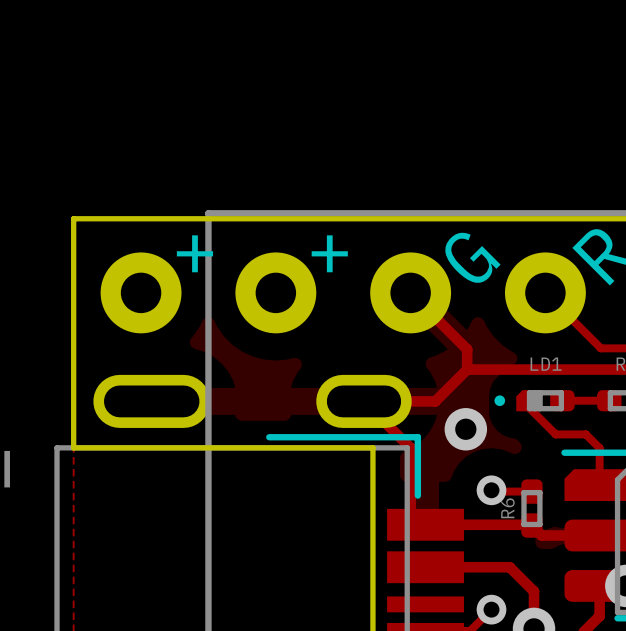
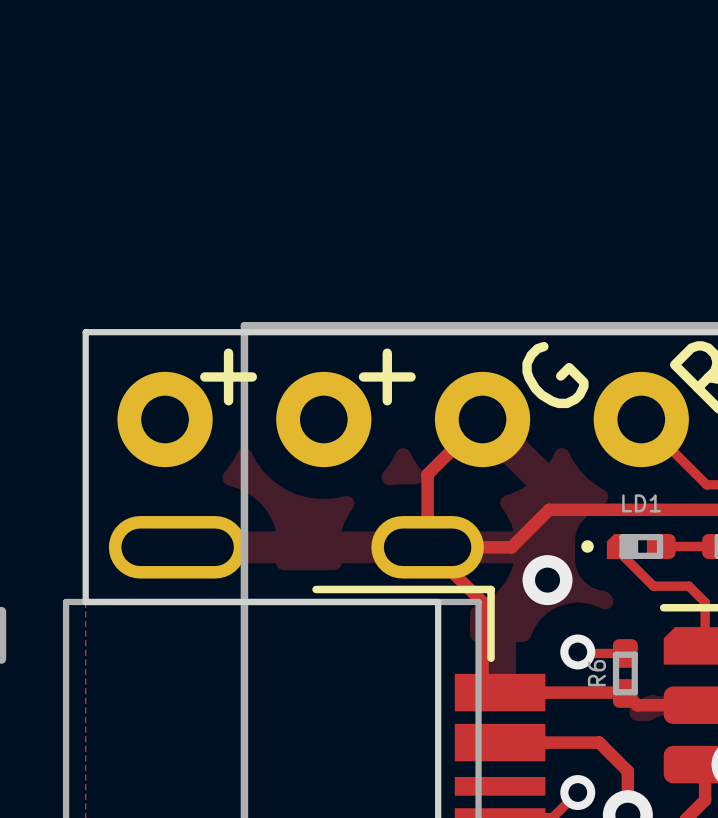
track: (410, 292) (467, 349) (467, 369) -> (482, 419) (427, 474) (427, 547)

